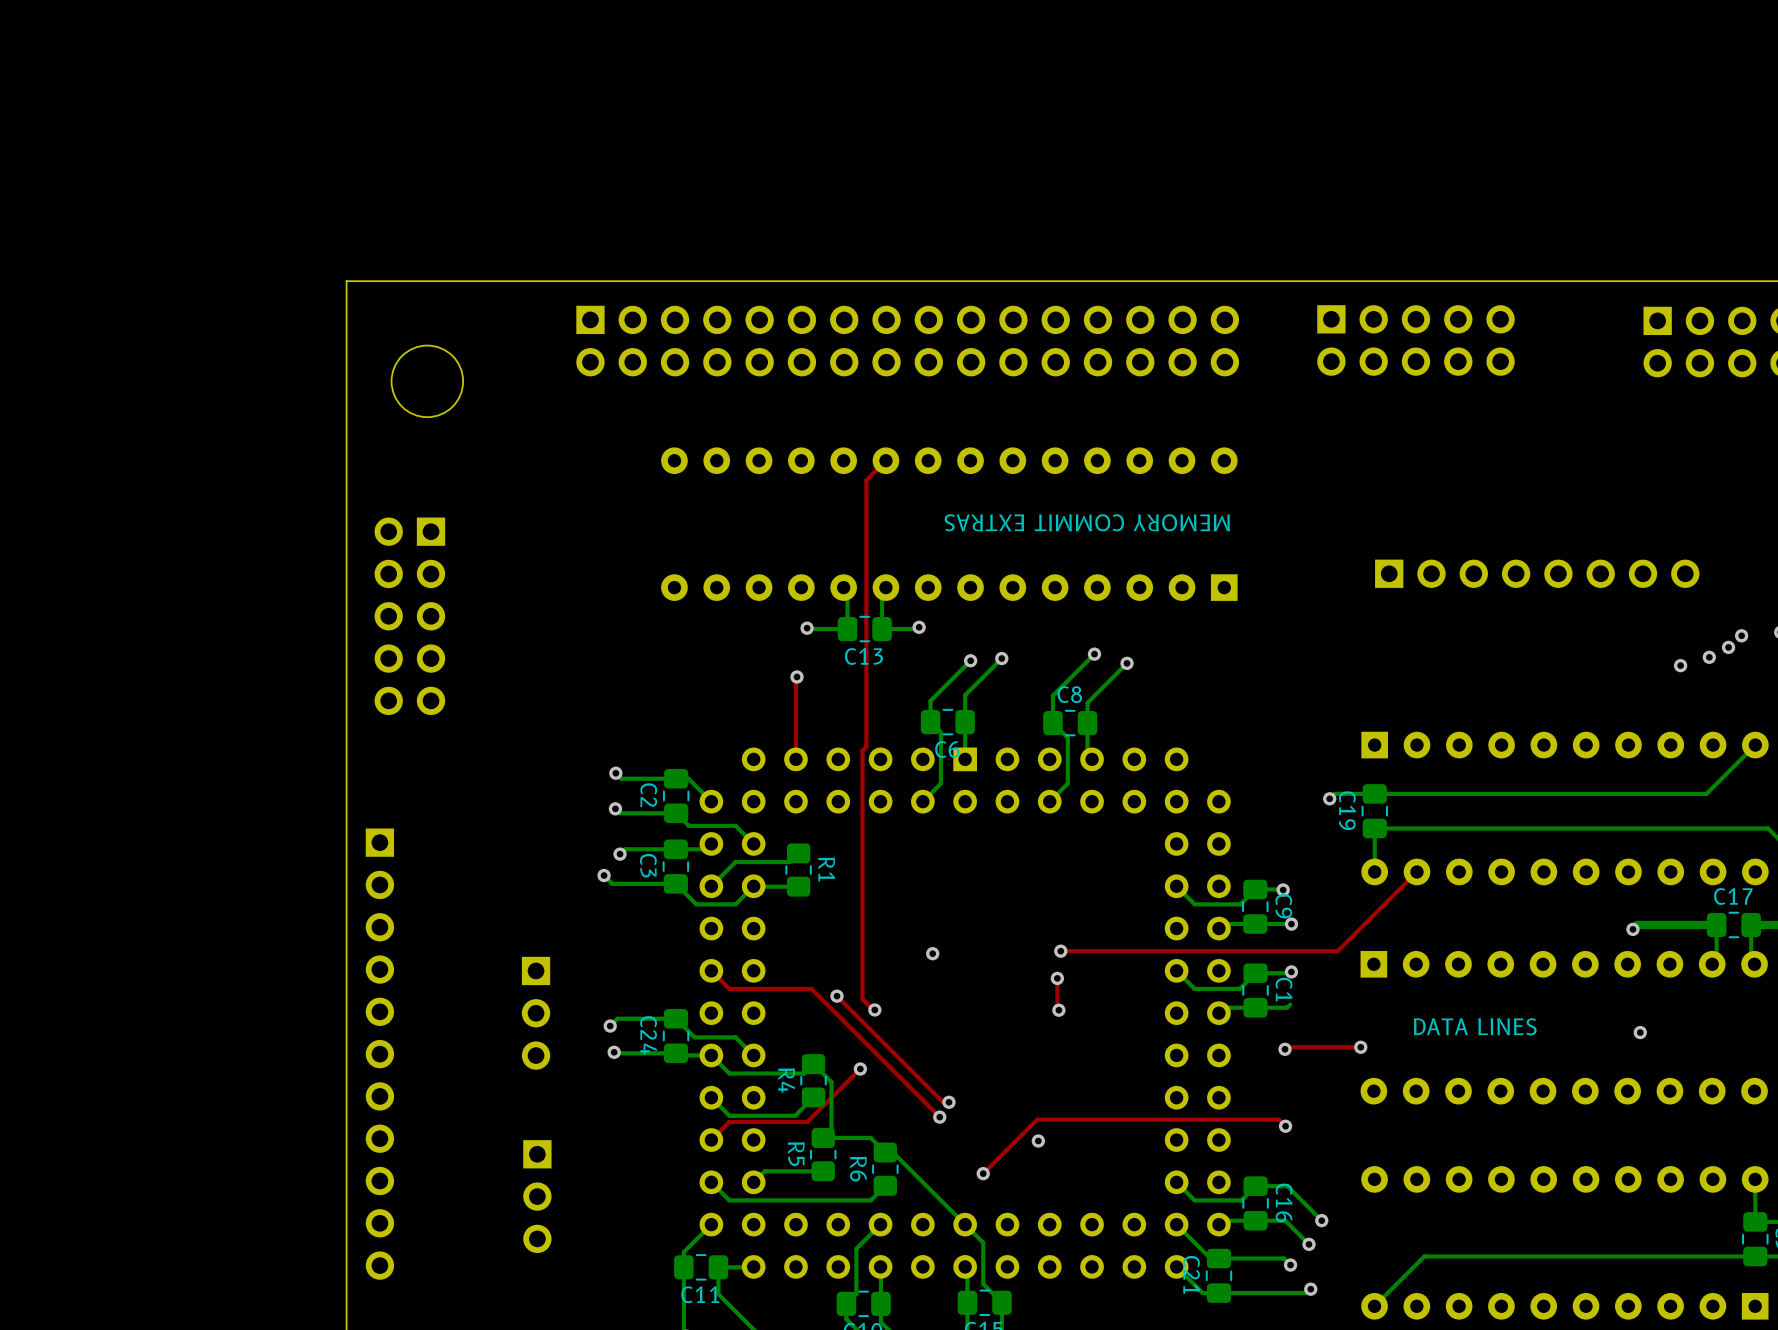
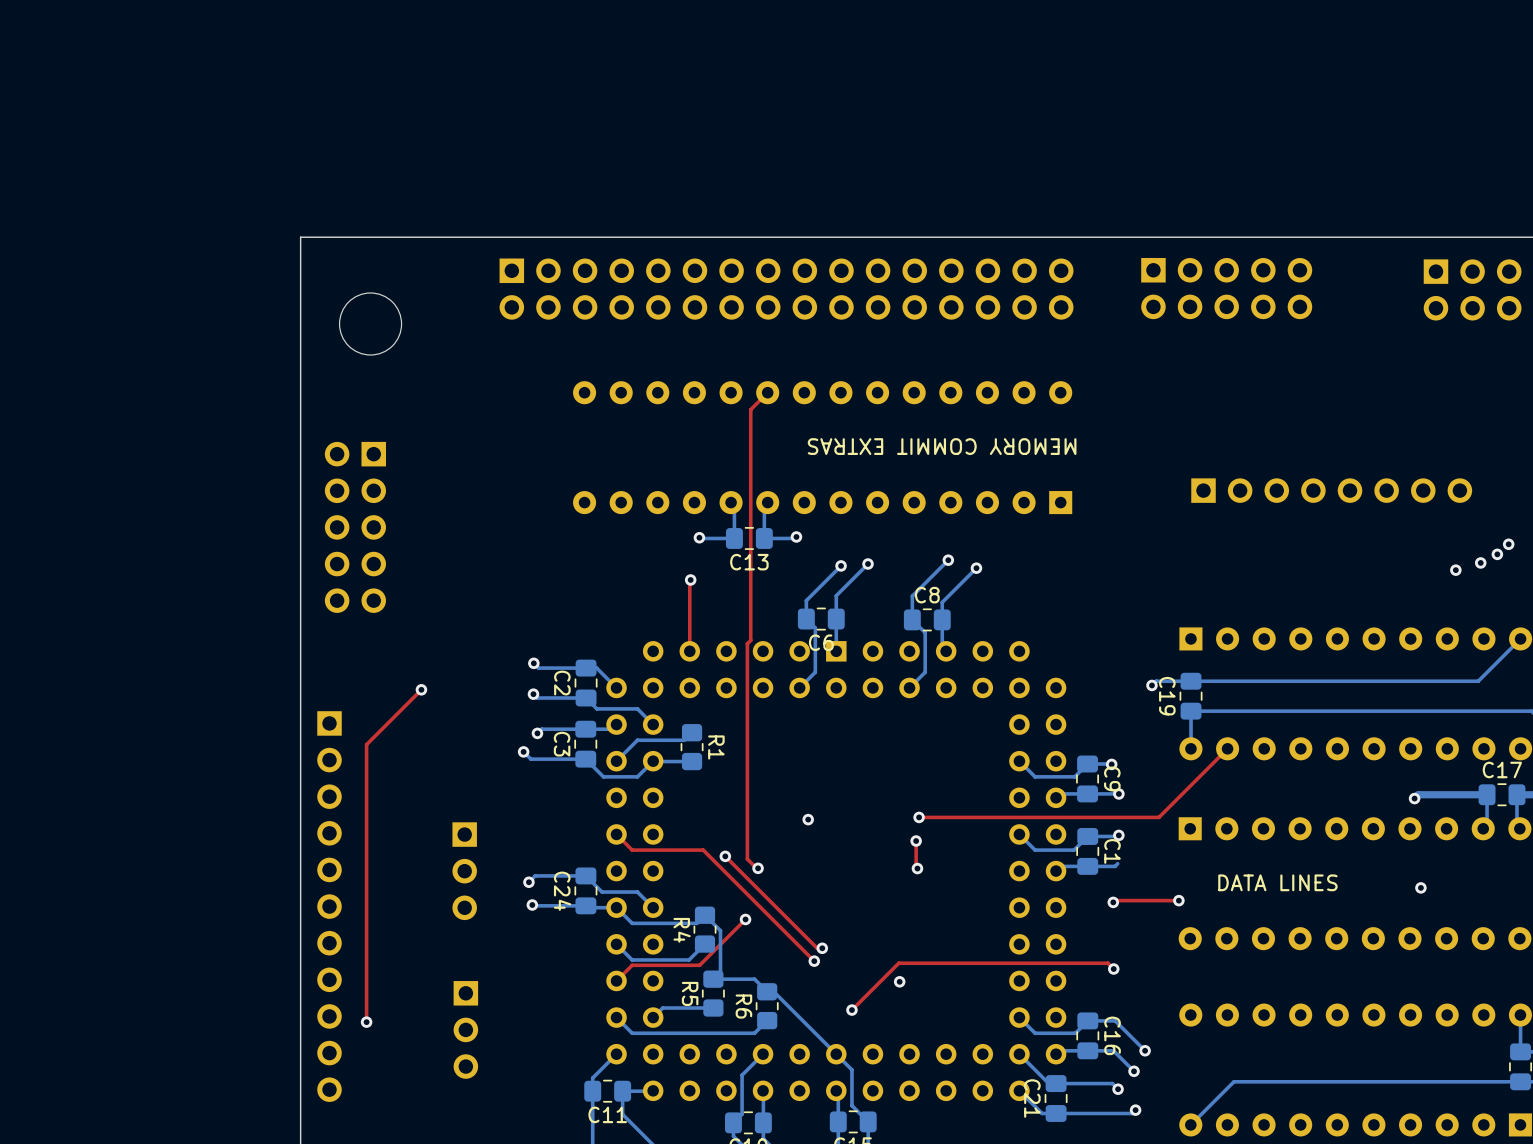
top track: none -> (421, 689) (366, 744) (366, 1022)
via: none -> (421, 689)
via: none -> (366, 1022)

